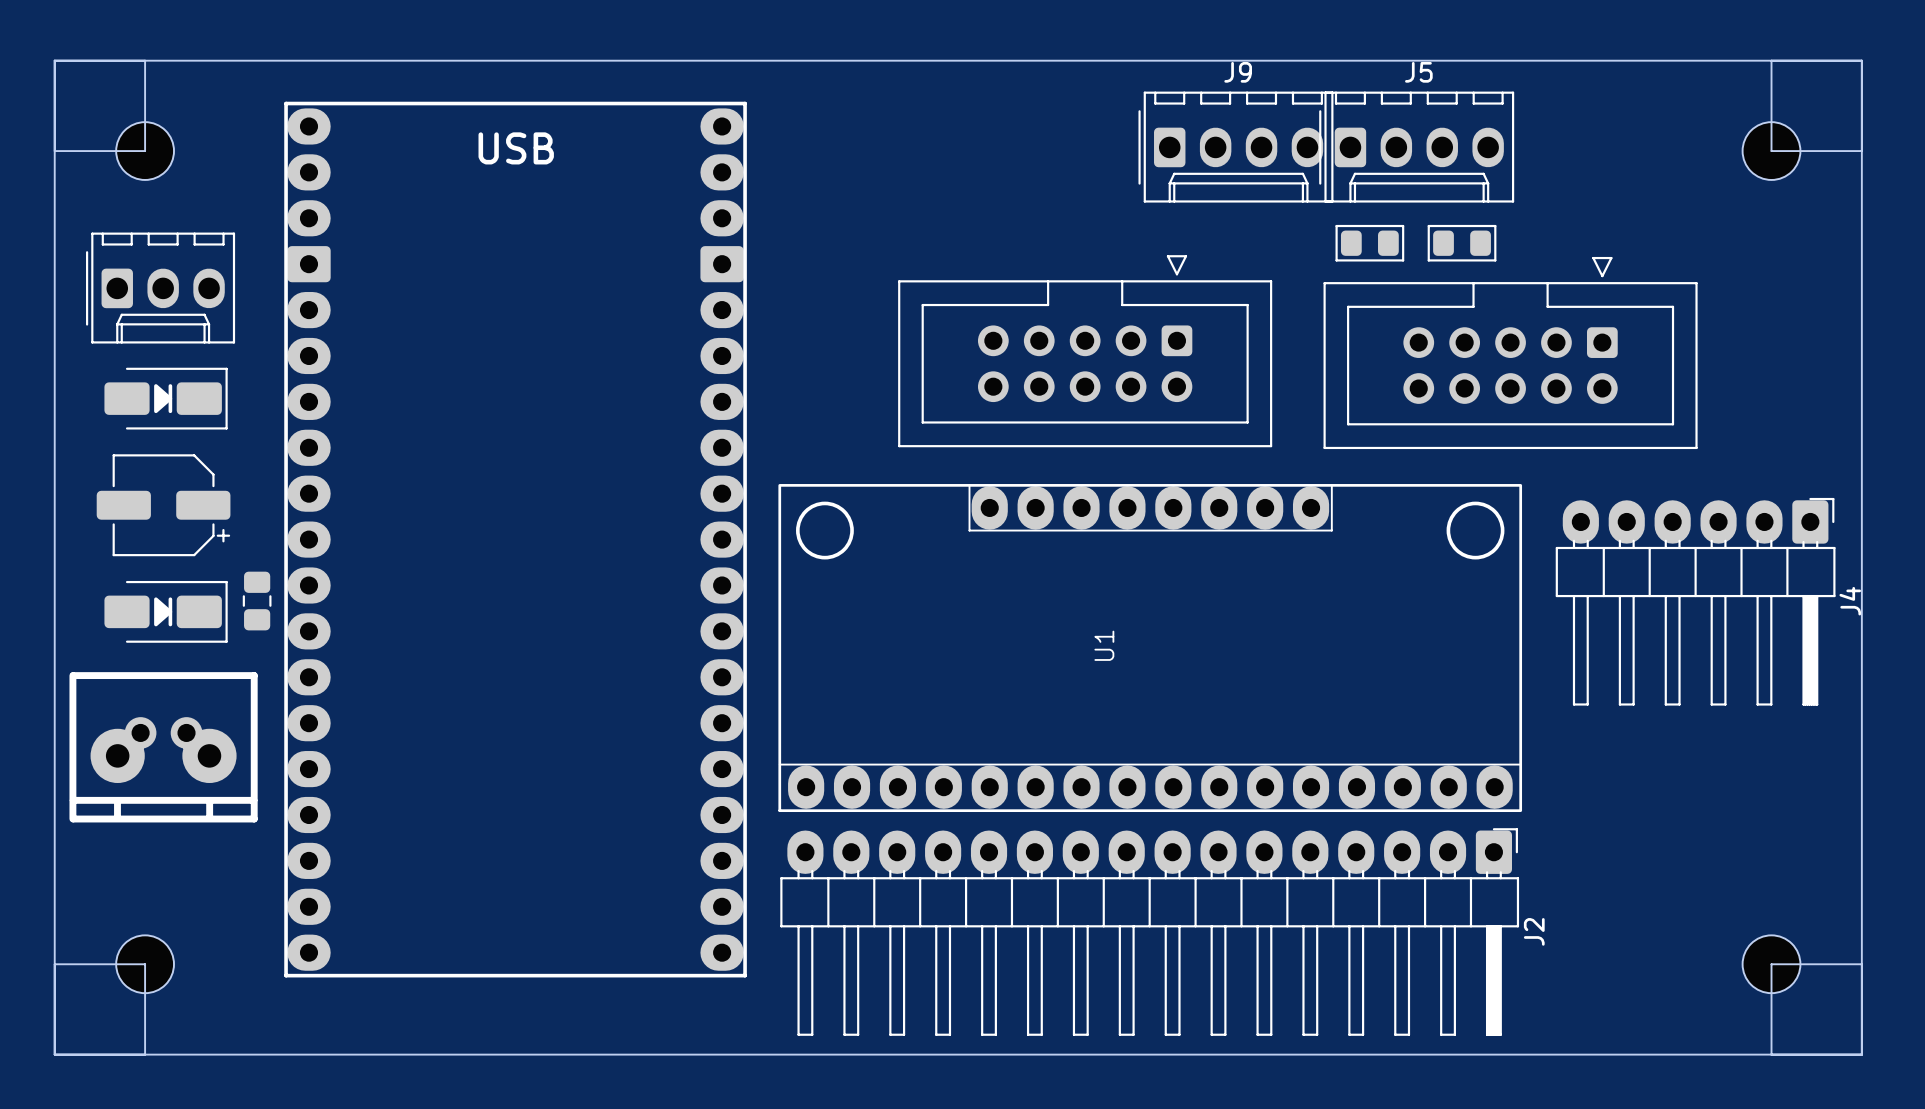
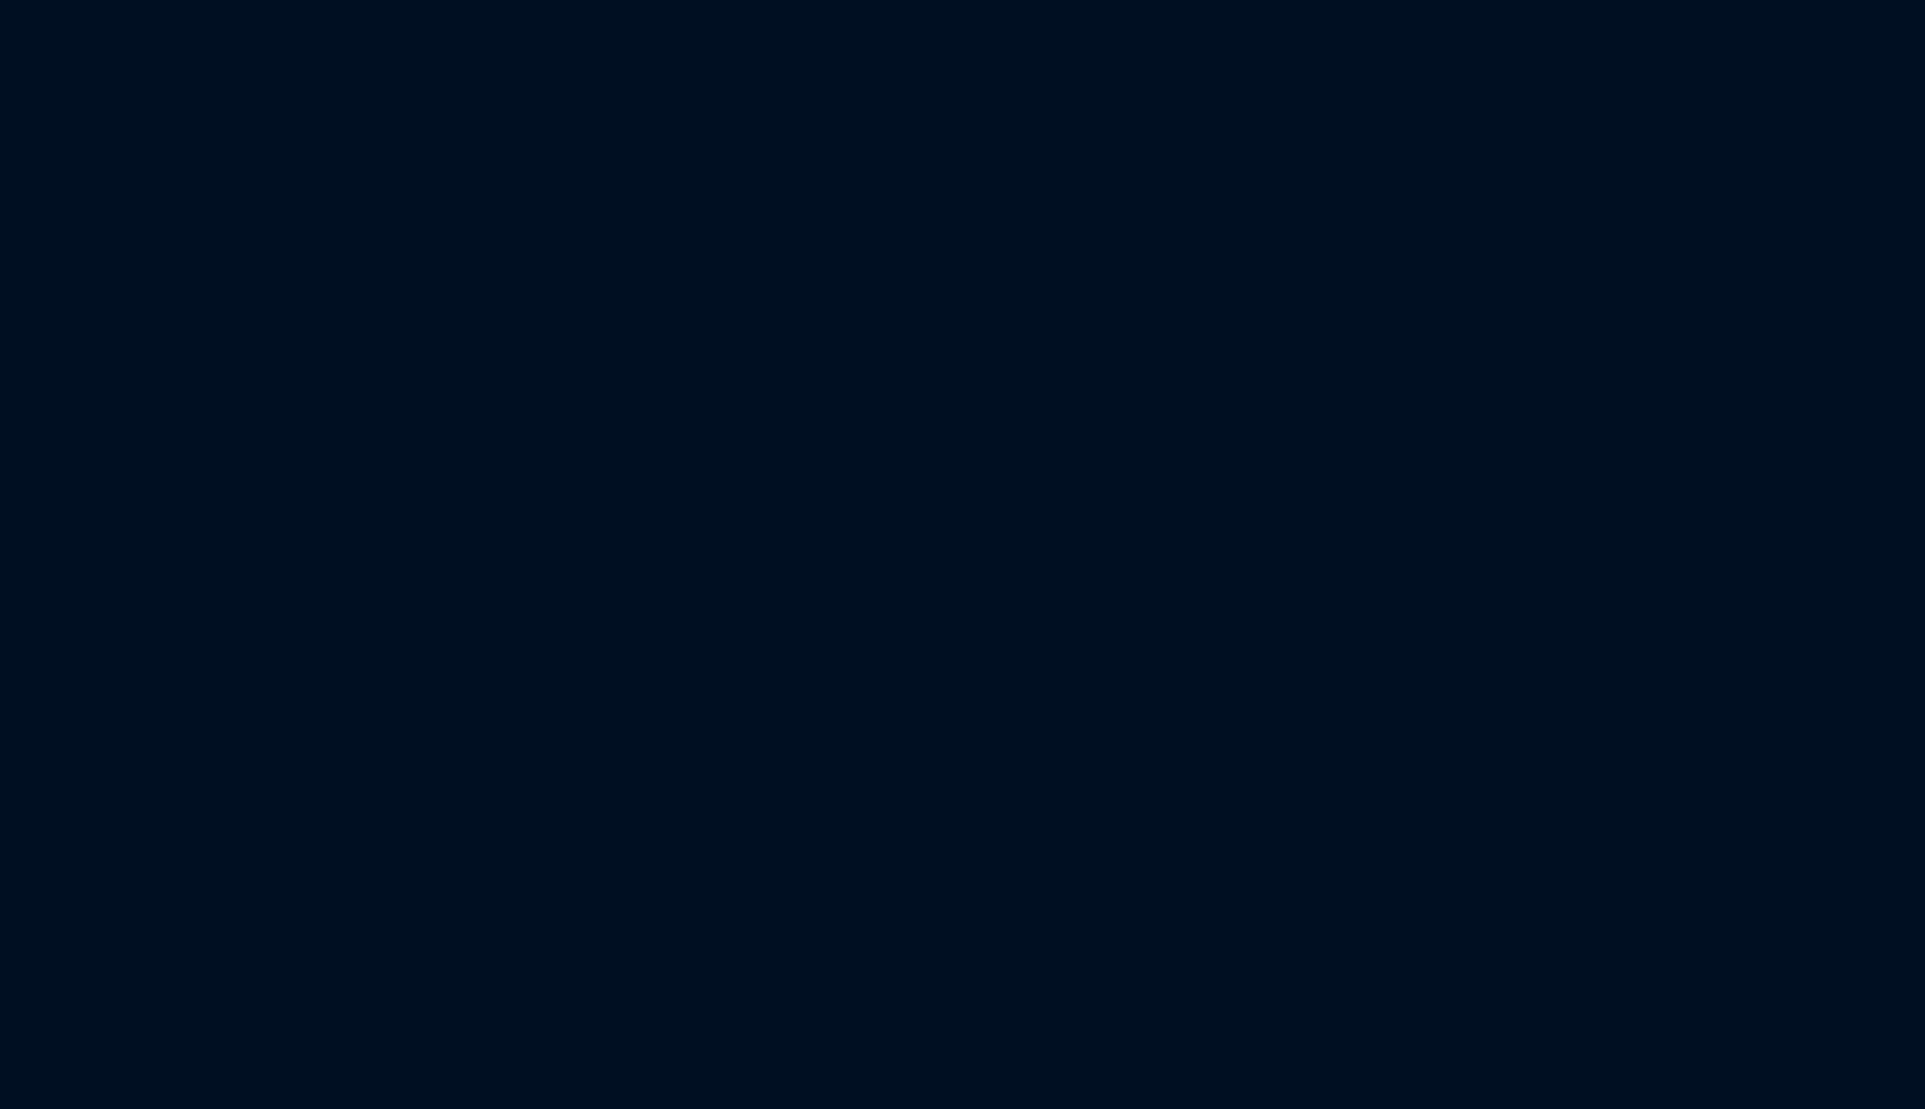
board edge: (54, 60) (1861, 60) (1861, 1054) (54, 1054) (54, 60) -> none
board edge: (145, 60) (145, 151) (54, 151) -> none
board edge: (1771, 60) (1771, 151) (1861, 151) -> none
J9: (1235, 147) -> none
J5: (1416, 147) -> none
part: (145, 151) -> none
part: (1771, 151) -> none
part: (1369, 243) -> none
part: (1462, 243) -> none
part: (160, 288) -> none
part: (1085, 351) -> none
part: (1510, 353) -> none
part: (166, 398) -> none
part: (163, 505) -> none
part: (515, 539) -> none
part: (257, 601) -> none
J4: (1695, 601) -> none
part: (166, 611) -> none
U1: (1150, 648) -> none
part: (163, 747) -> none
J2: (1149, 932) -> none
board edge: (54, 964) (145, 964) (145, 1054) -> none
part: (145, 964) -> none
part: (1771, 964) -> none
board edge: (1861, 964) (1771, 964) (1771, 1054) -> none

